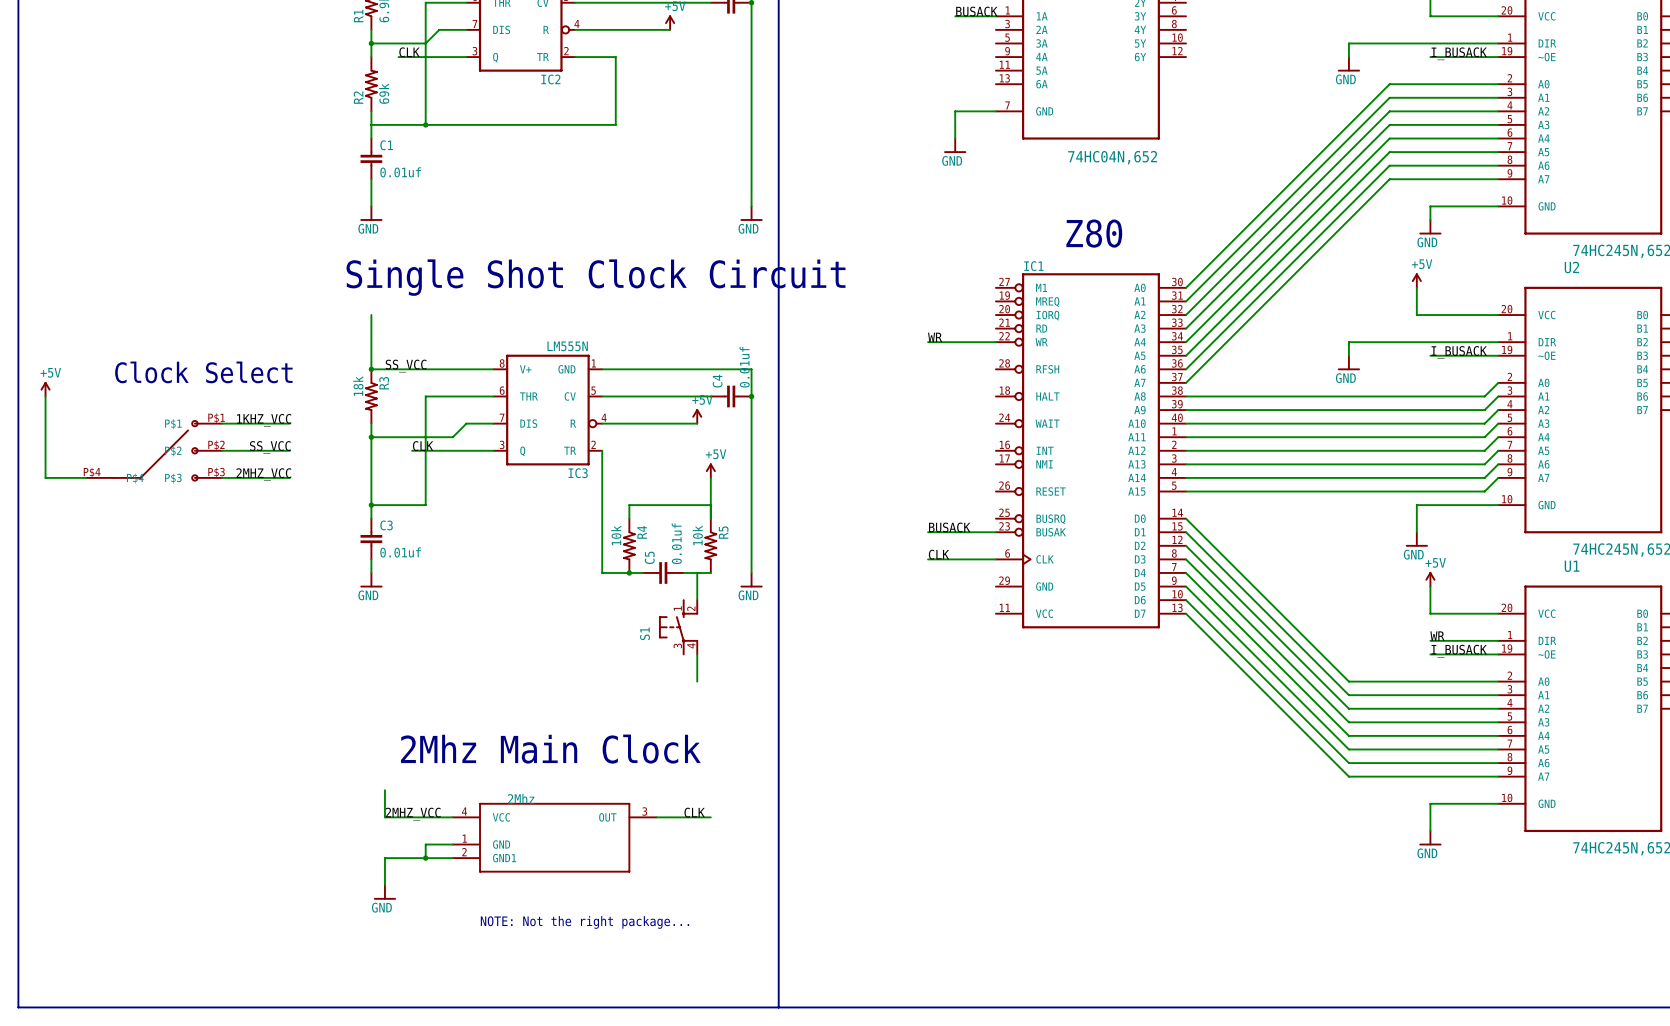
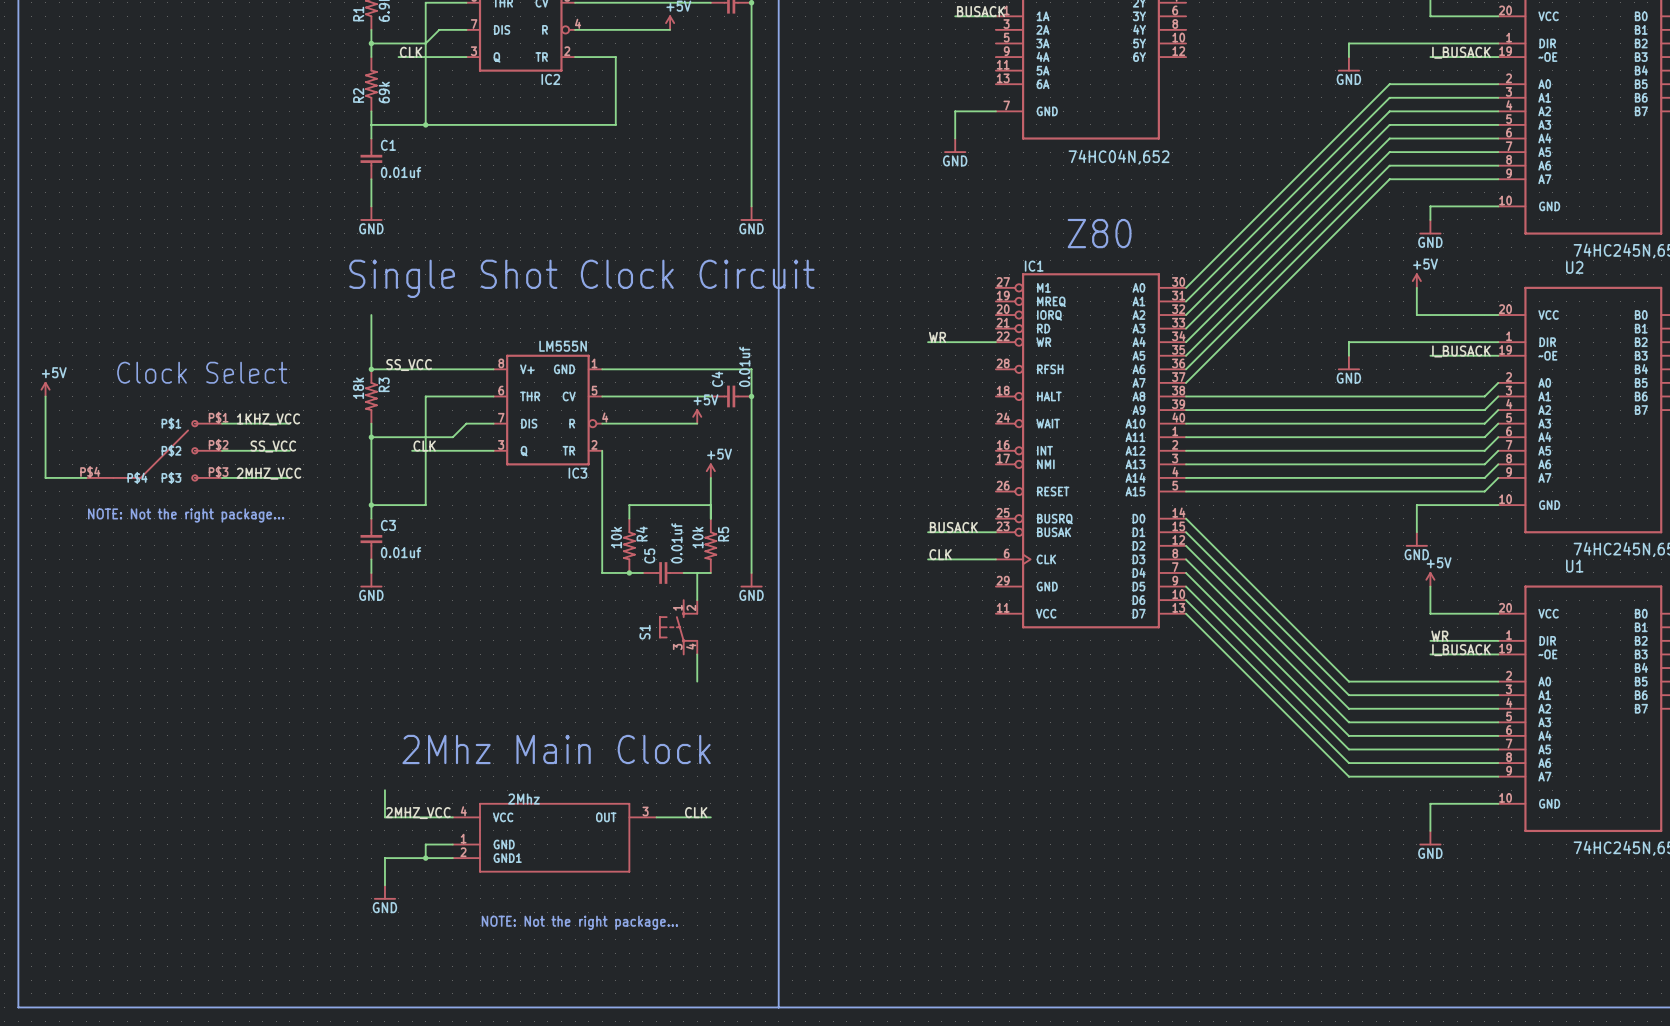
text: none -> NOTE: Not the right package... (186, 515)

